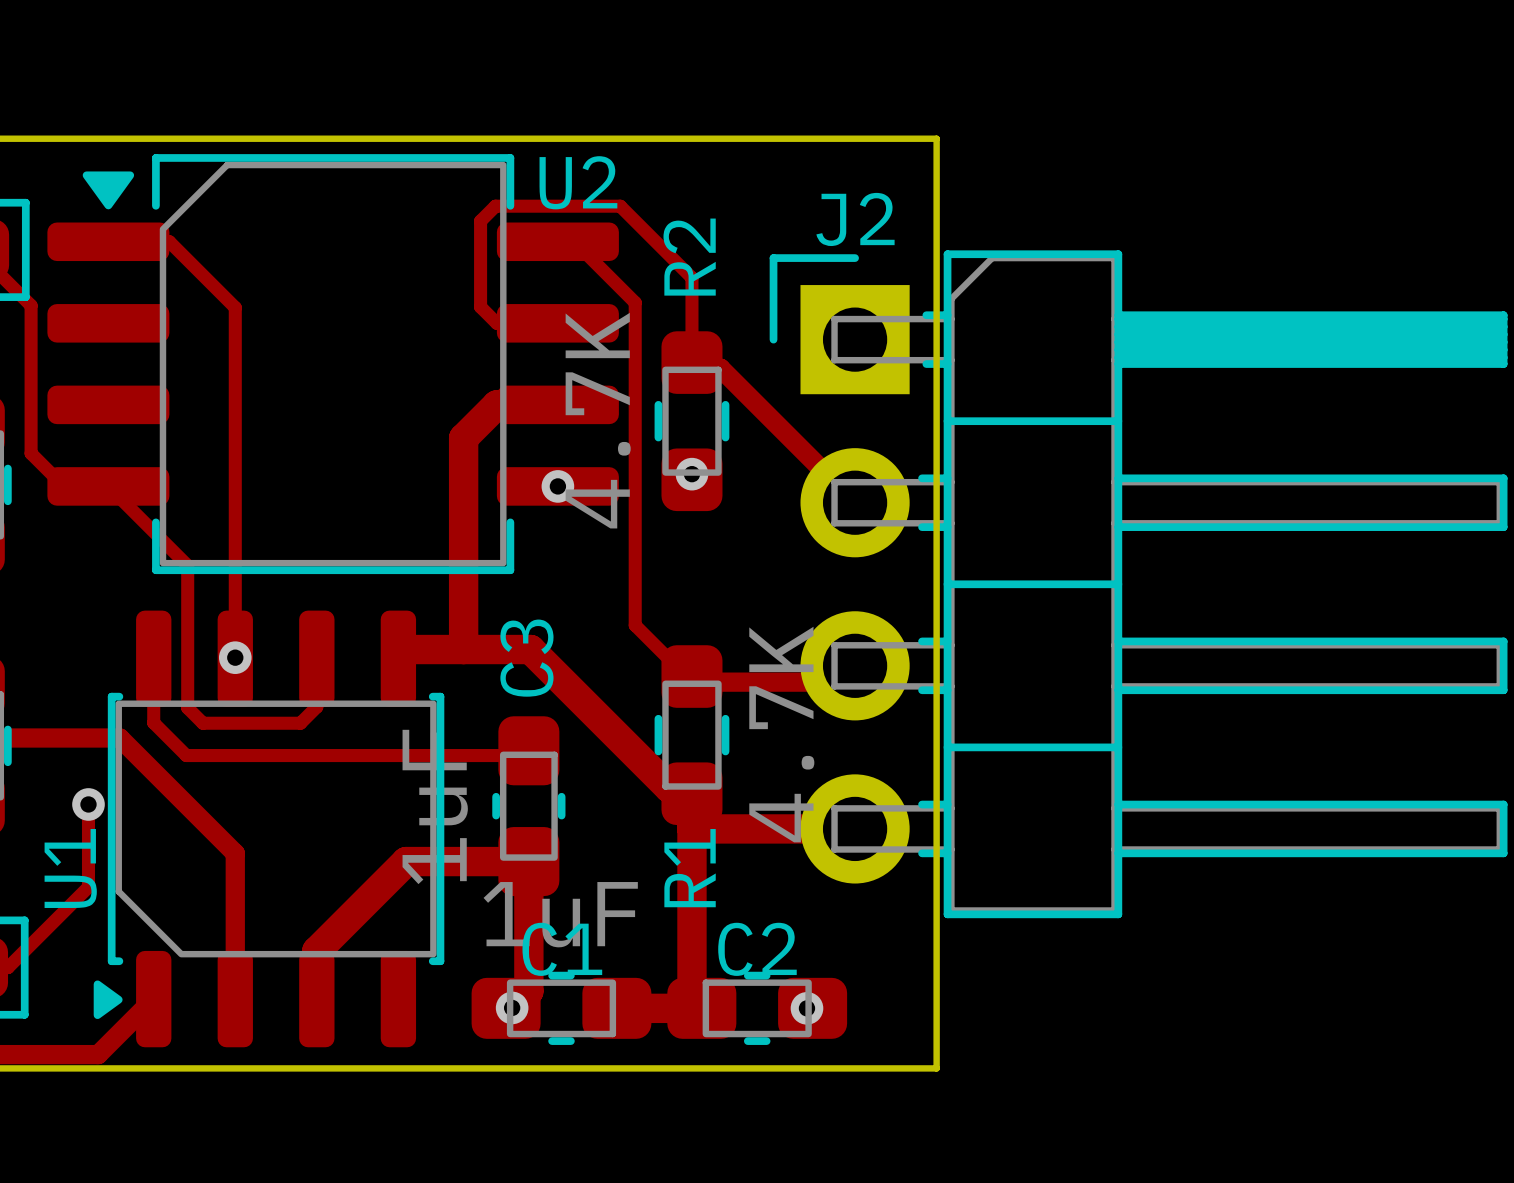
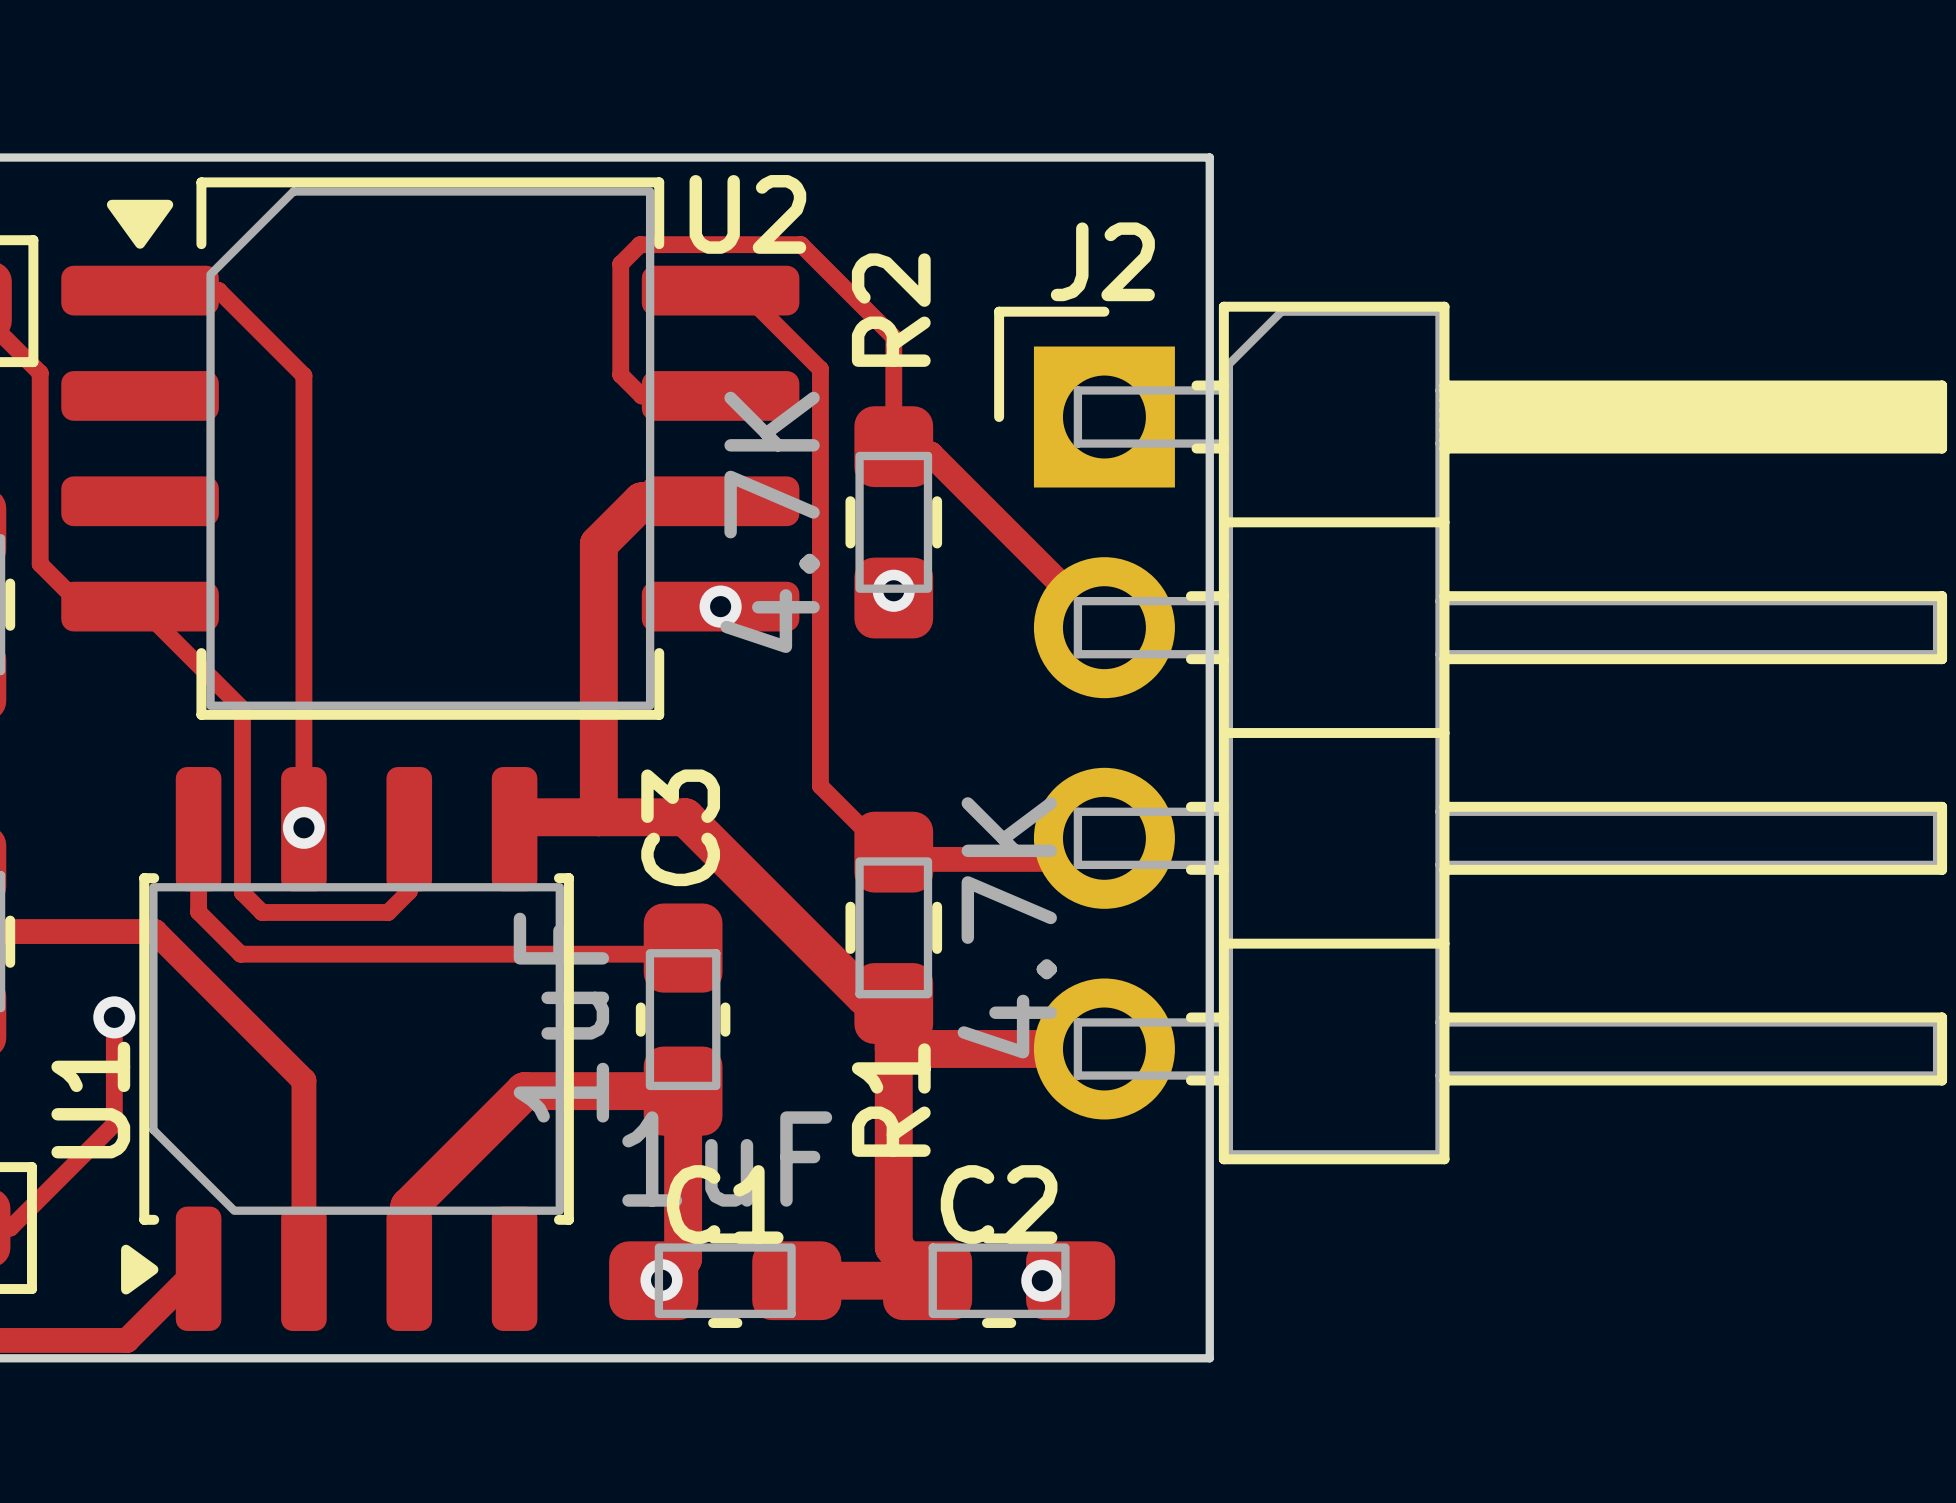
C2 position: (757, 1008) -> (999, 1280)

